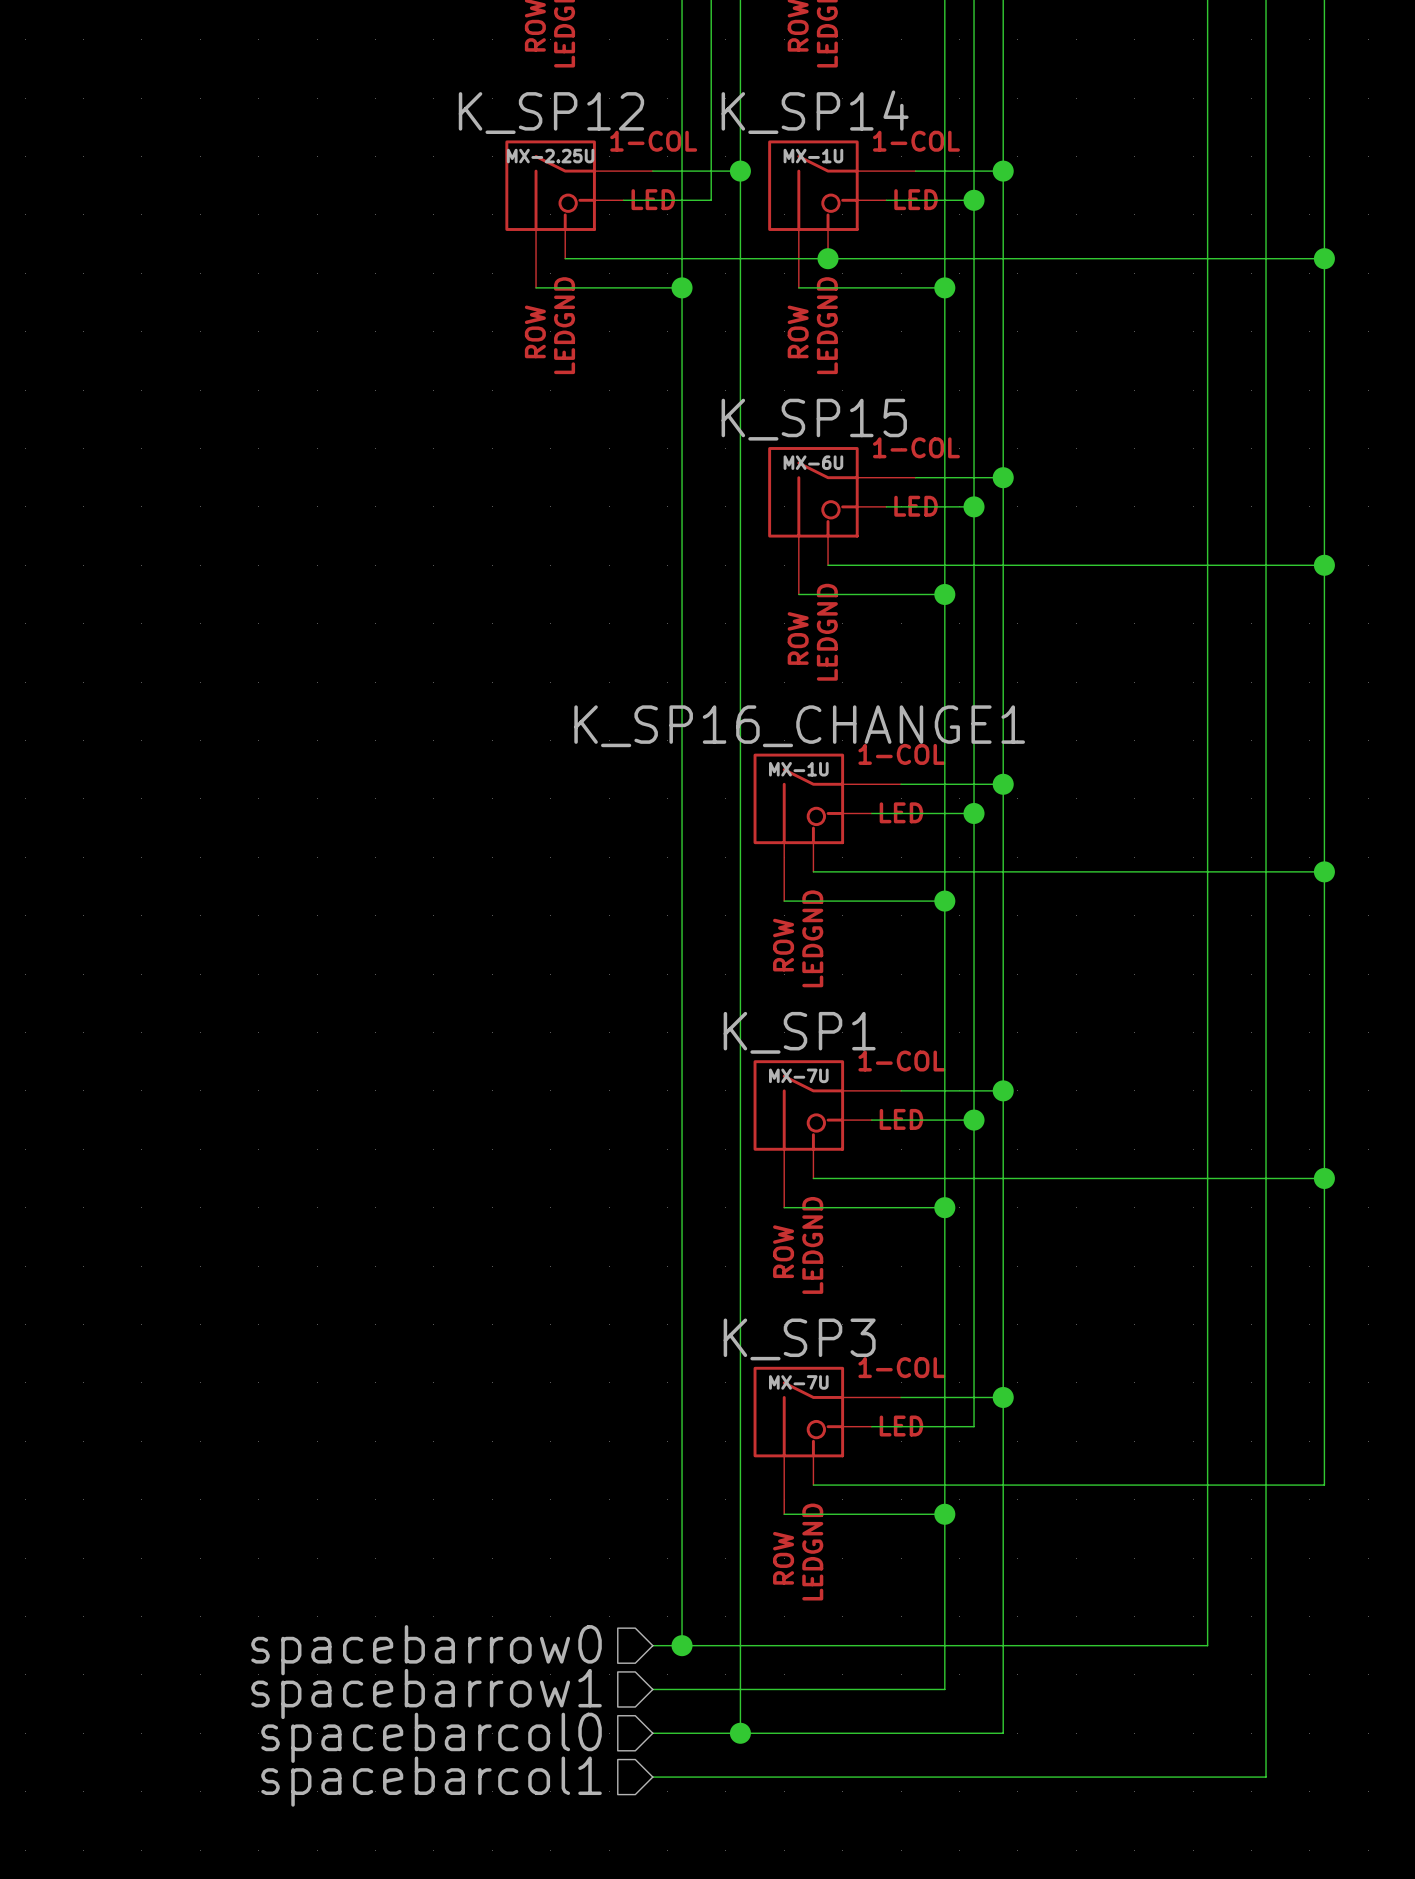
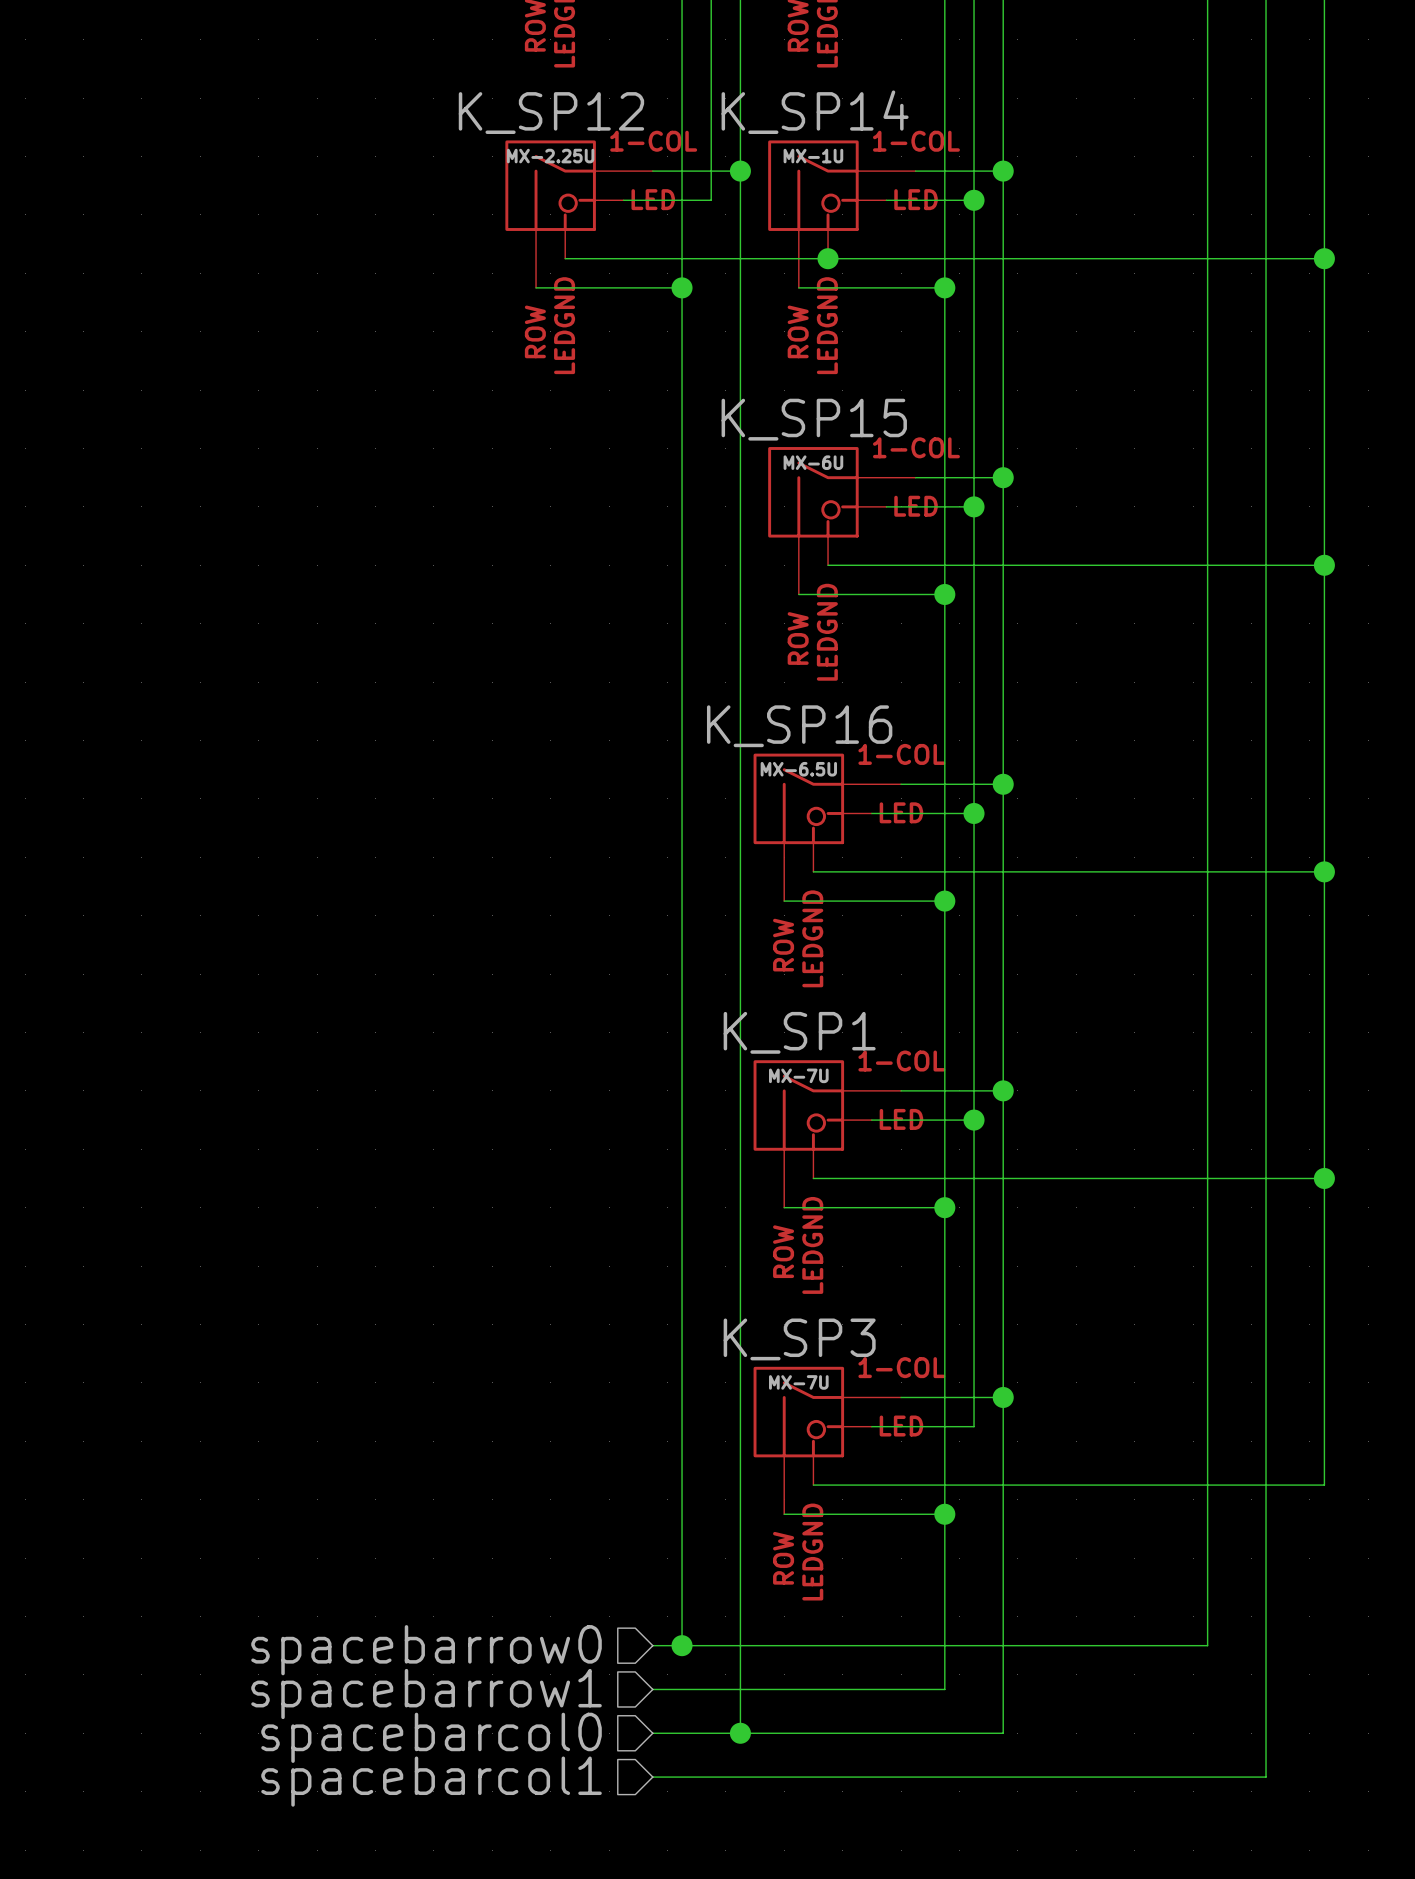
K_SP16_CHANGE1 name: K_SP16_CHANGE1 (799, 726) -> K_SP16 (799, 726)
K_SP16_CHANGE1 value: MX-1U (798, 769) -> MX-6.5U (798, 769)

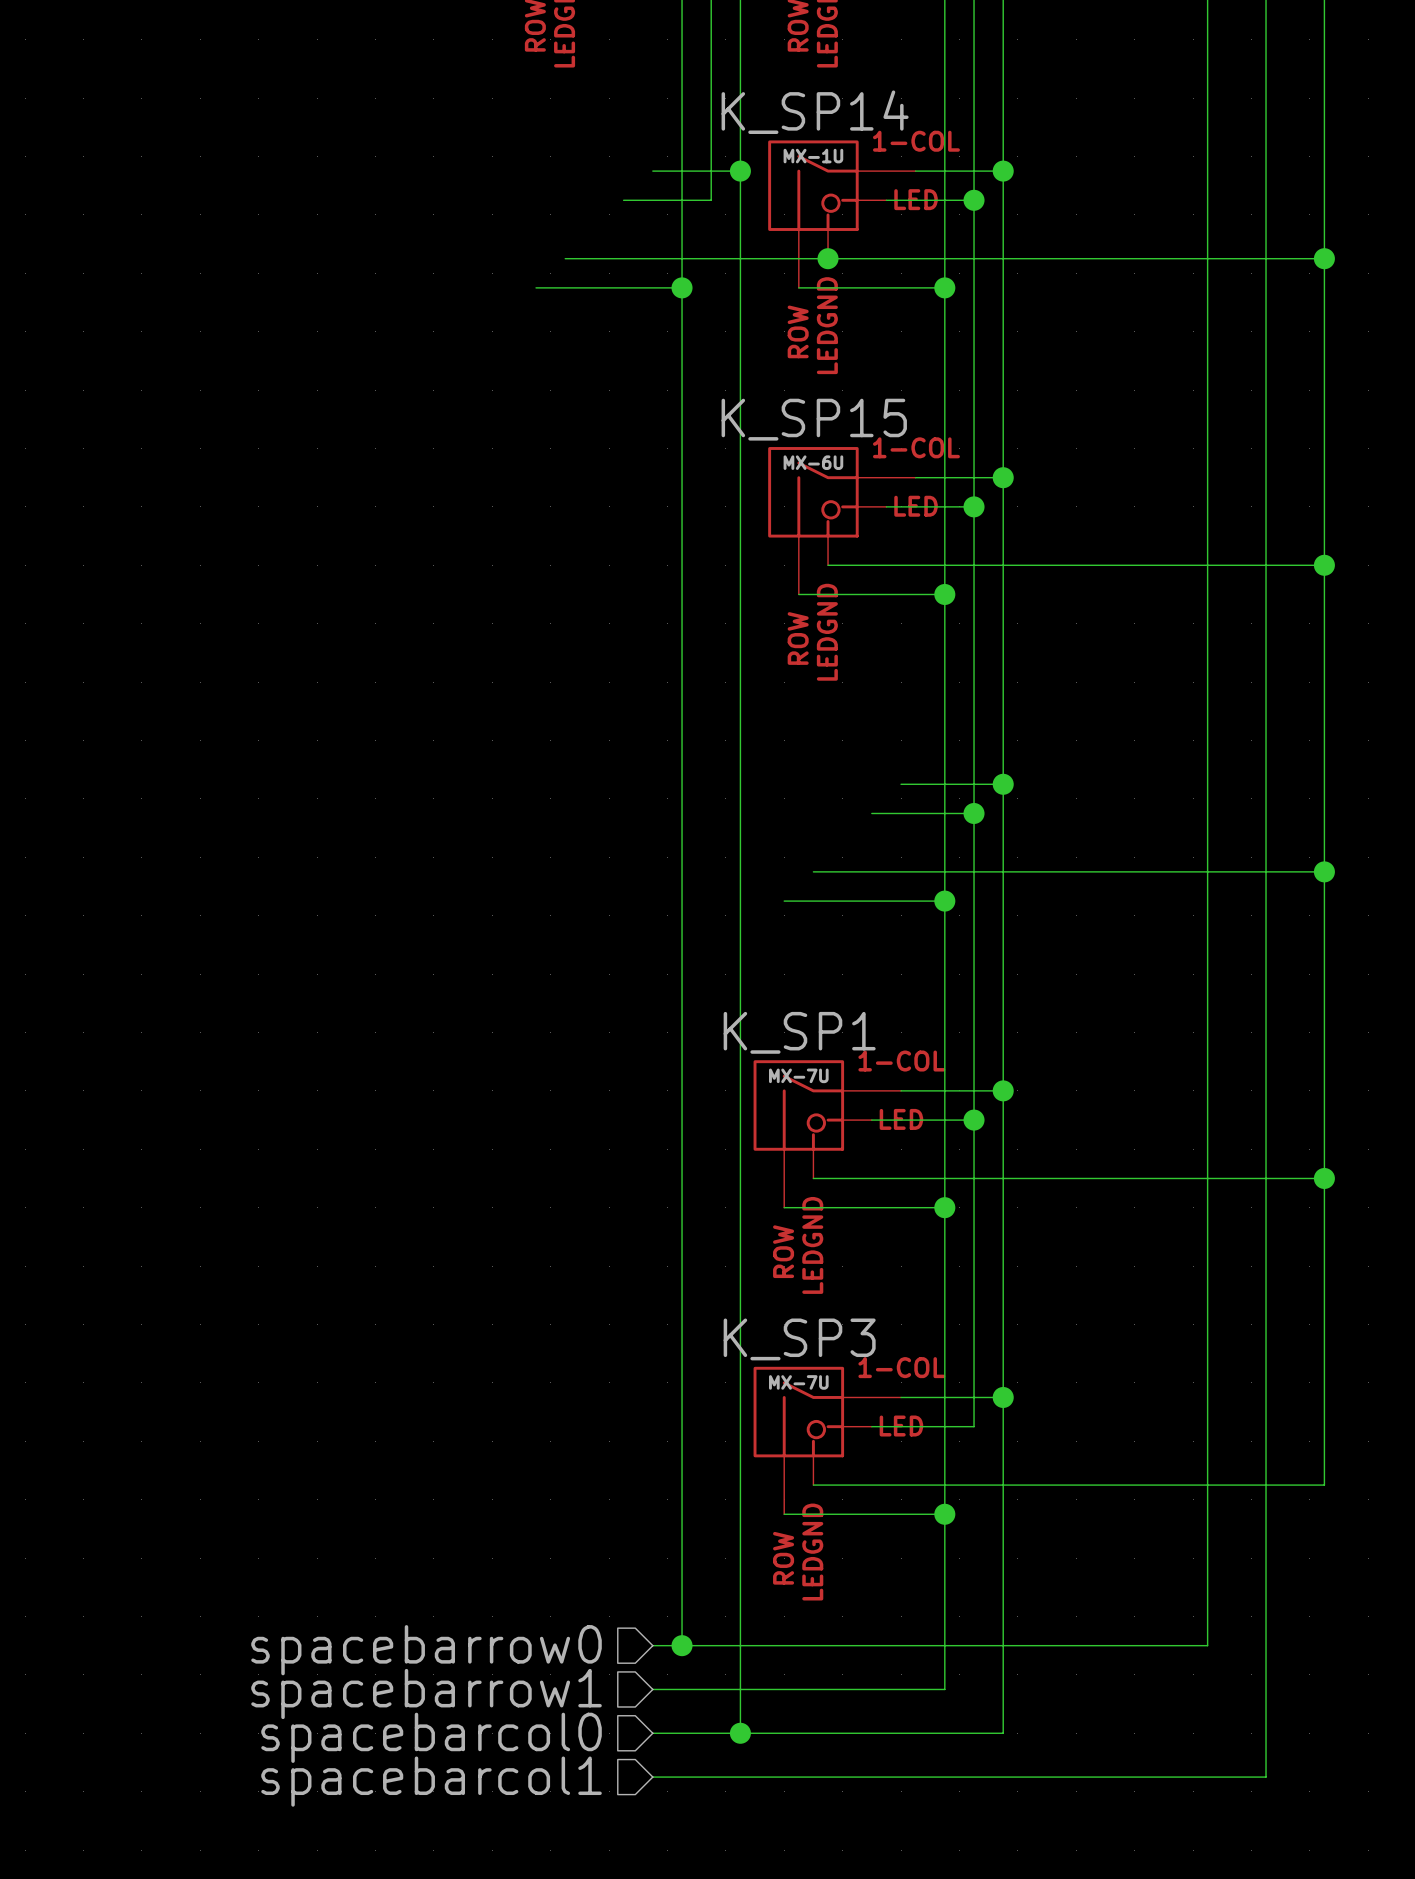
K_SP12: MX-2.25U (579, 214) -> none
K_SP16: MX-6.5U (827, 827) -> none

